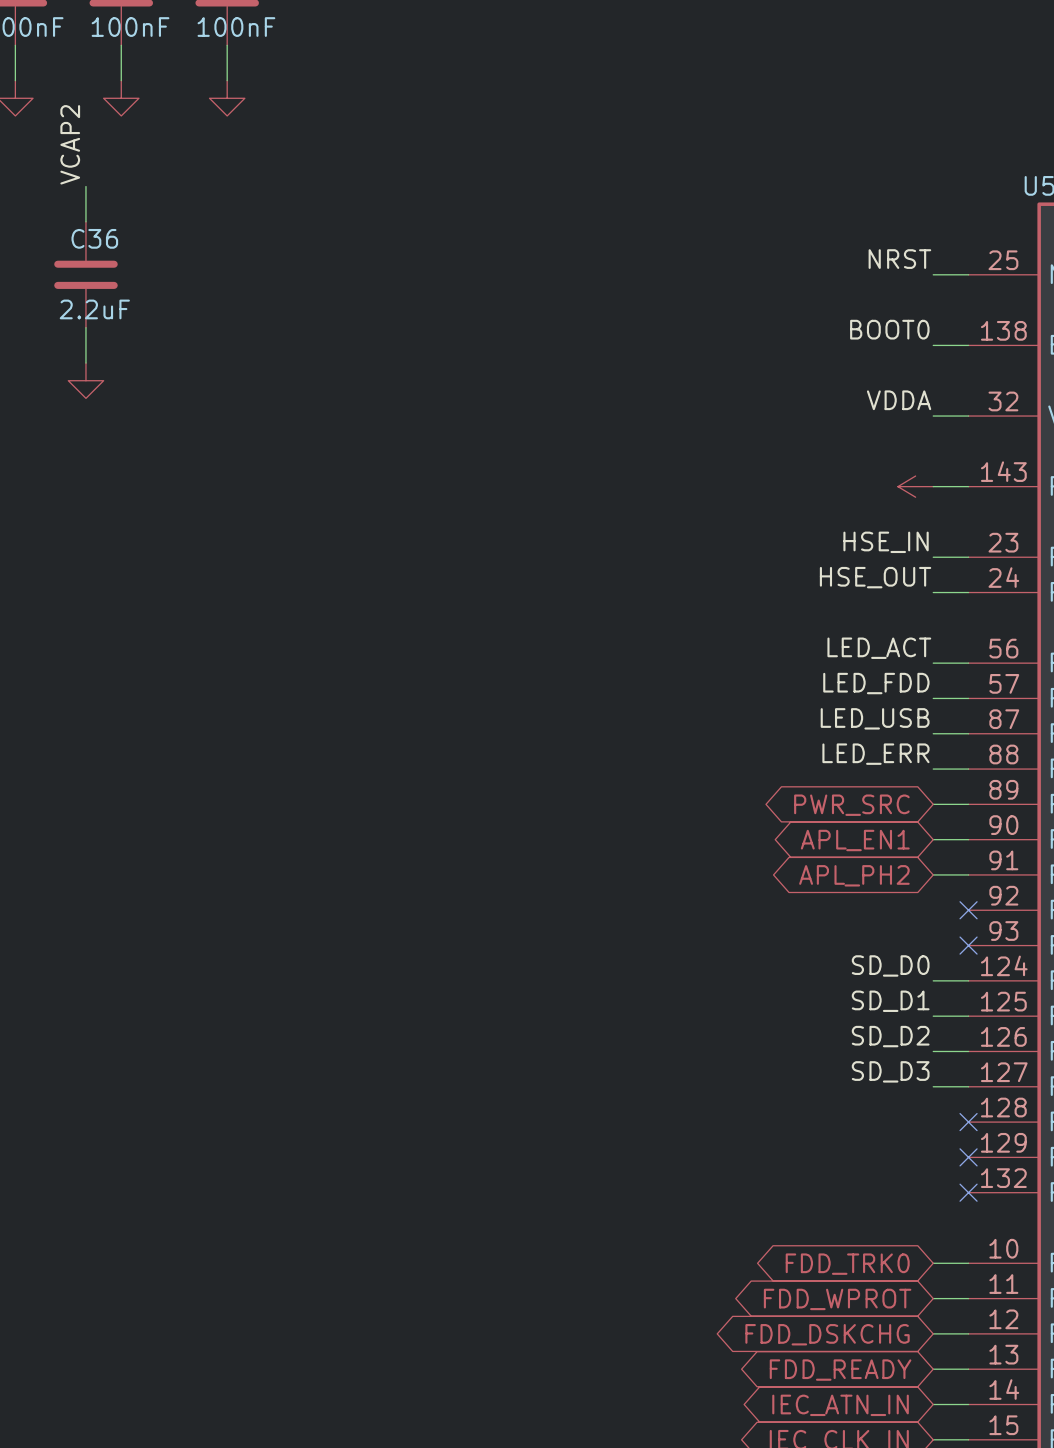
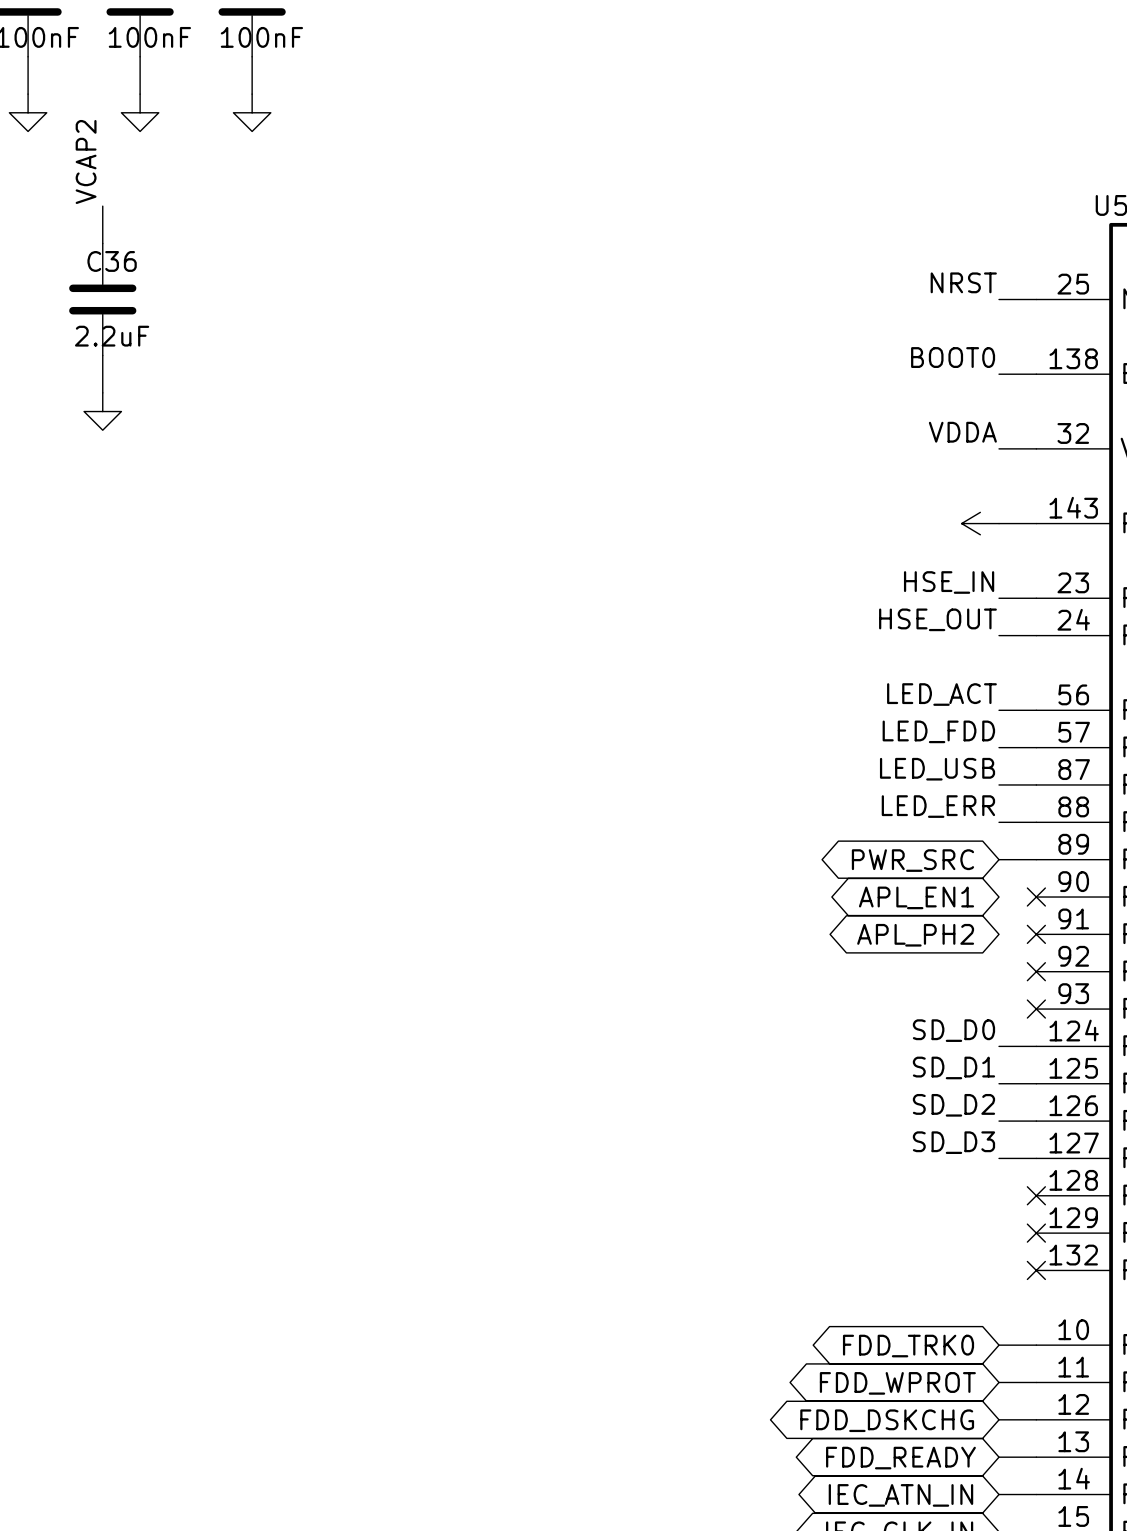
wire: (933, 839) (968, 839) -> none
no-connect mark: none -> (1036, 897)
wire: (933, 874) (968, 874) -> none
no-connect mark: none -> (1036, 934)

